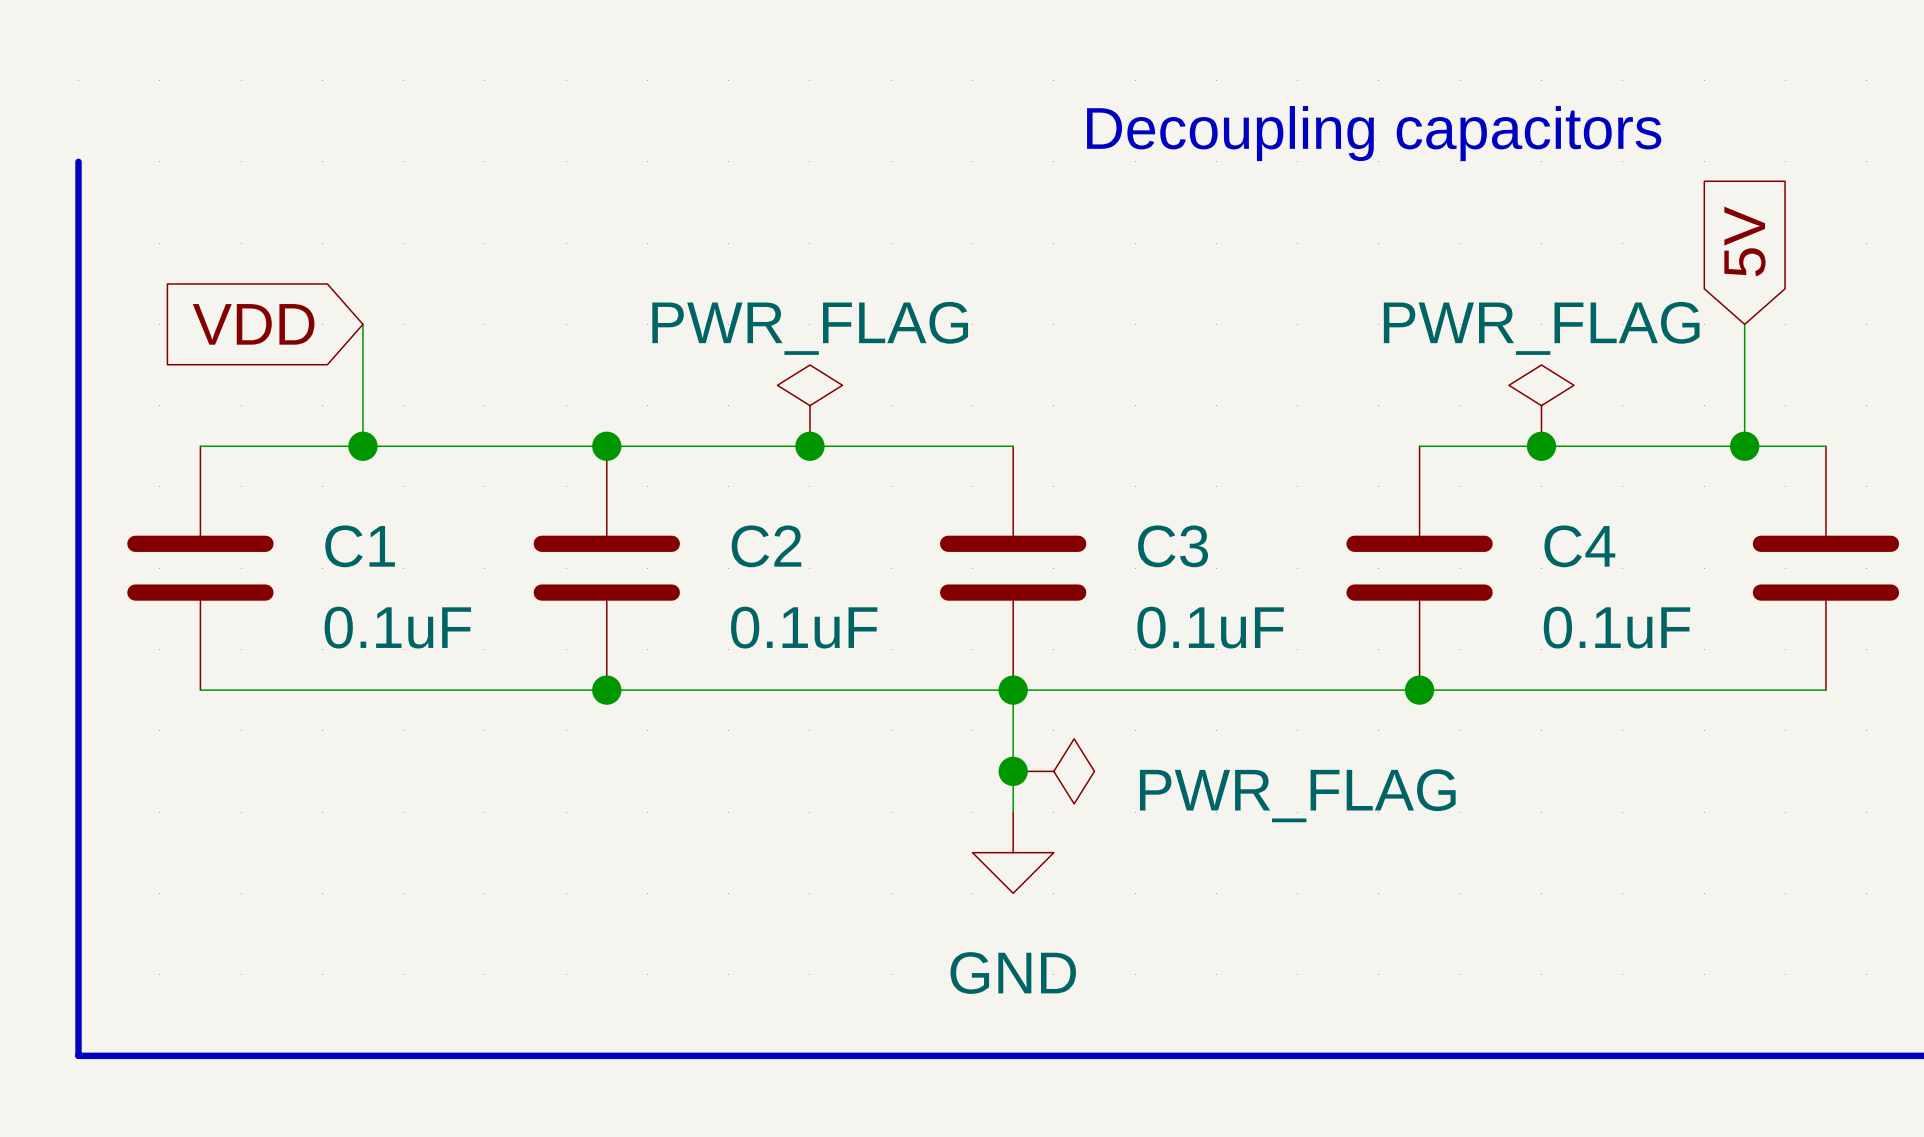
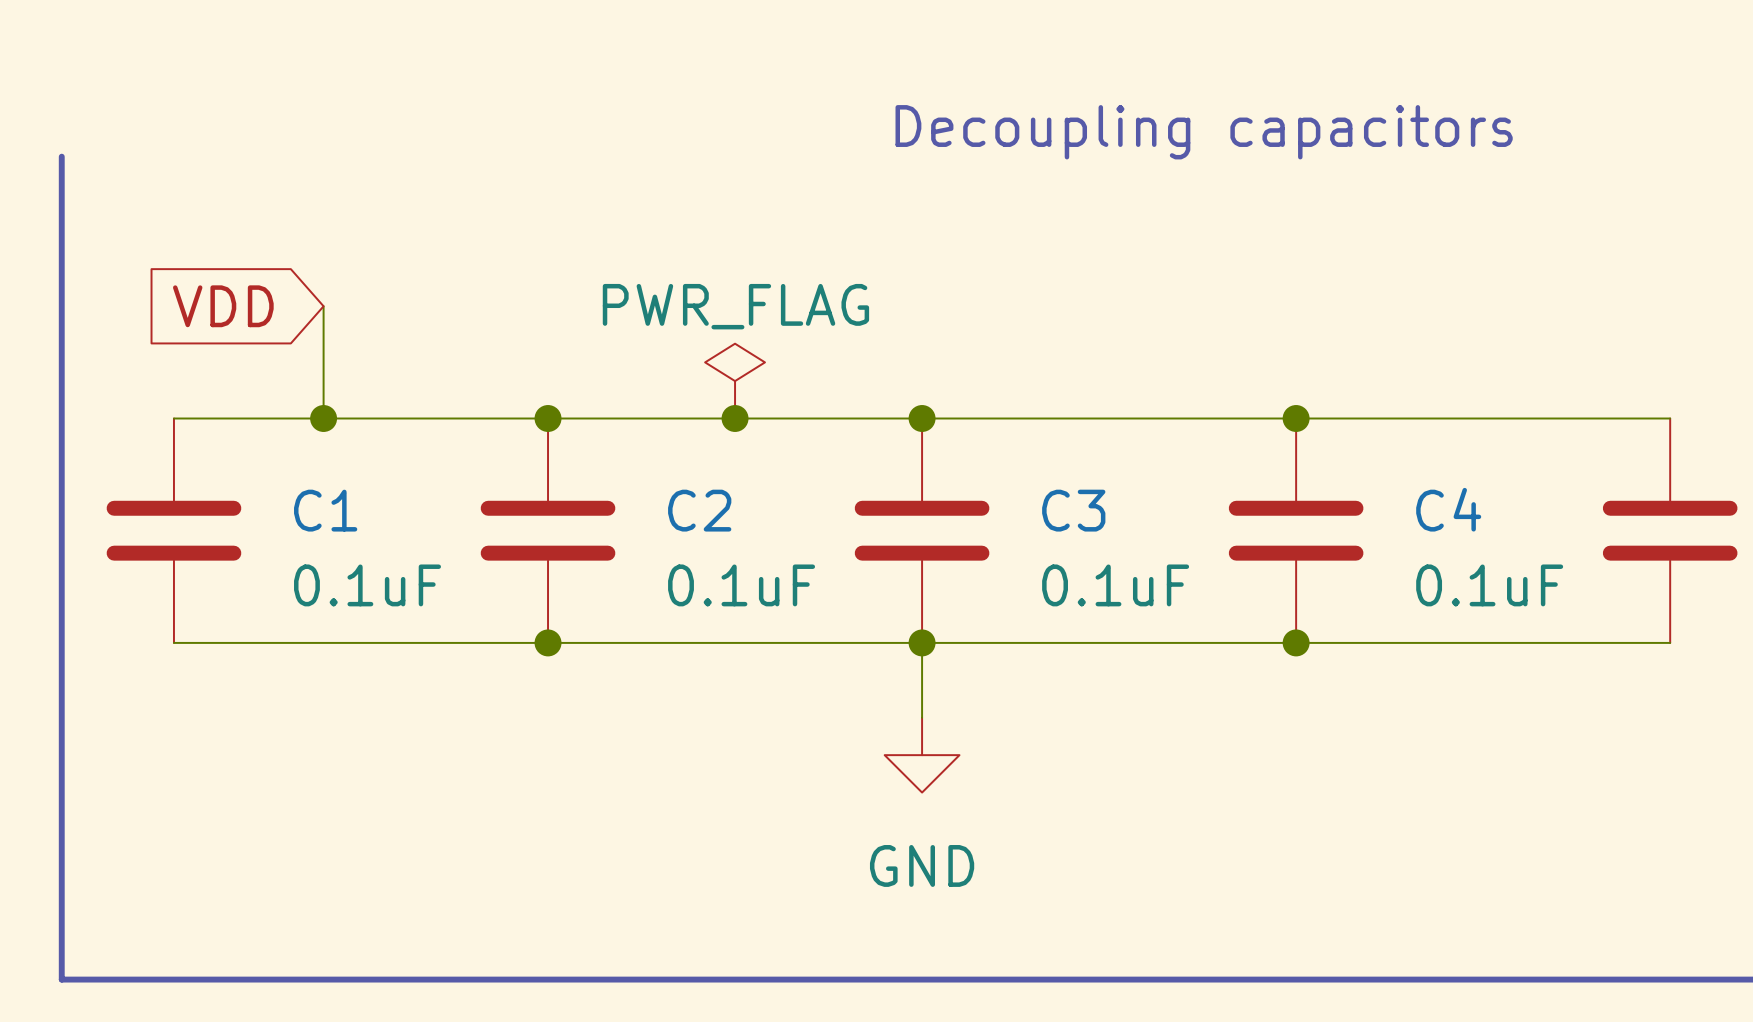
global label: 5V (1744, 241) -> none
wire: (1744, 324) (1744, 446) -> none
power symbol: PWR_FLAG (1541, 405) -> none
wire: none -> (922, 418) (1296, 418)
junction: none -> (922, 418)
junction position: (1541, 446) -> (1296, 418)
junction: (1744, 446) -> none
junction: (1013, 771) -> none
power symbol: PWR_FLAG (1053, 771) -> none
power symbol position: GND (1013, 852) -> GND (922, 755)

